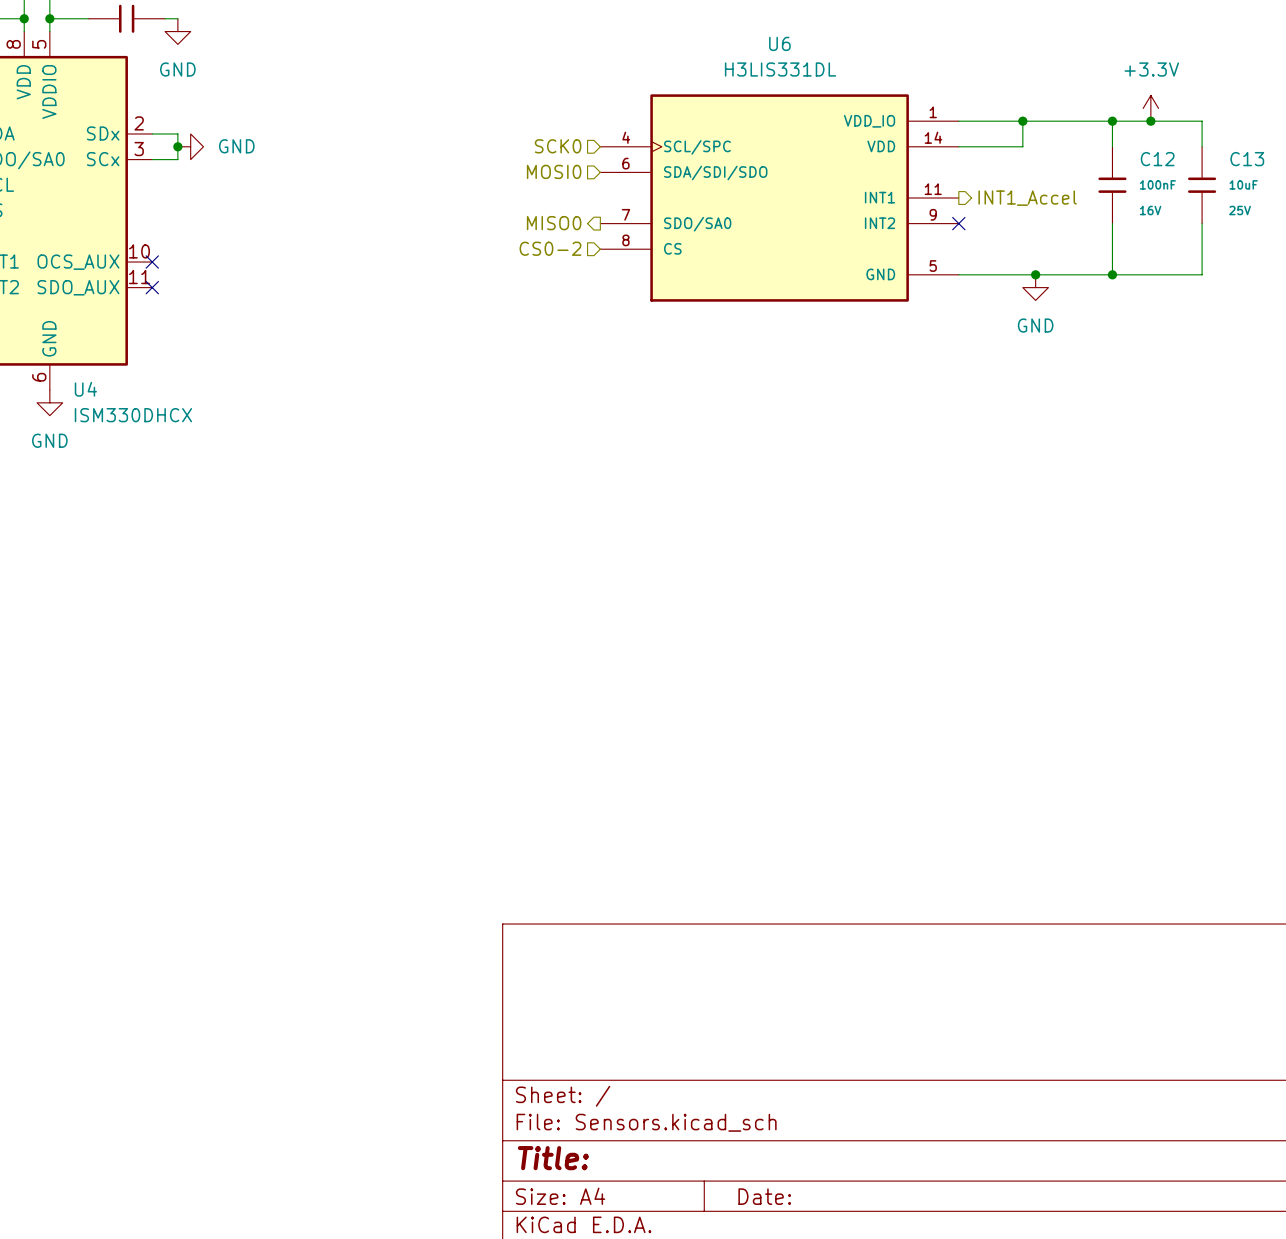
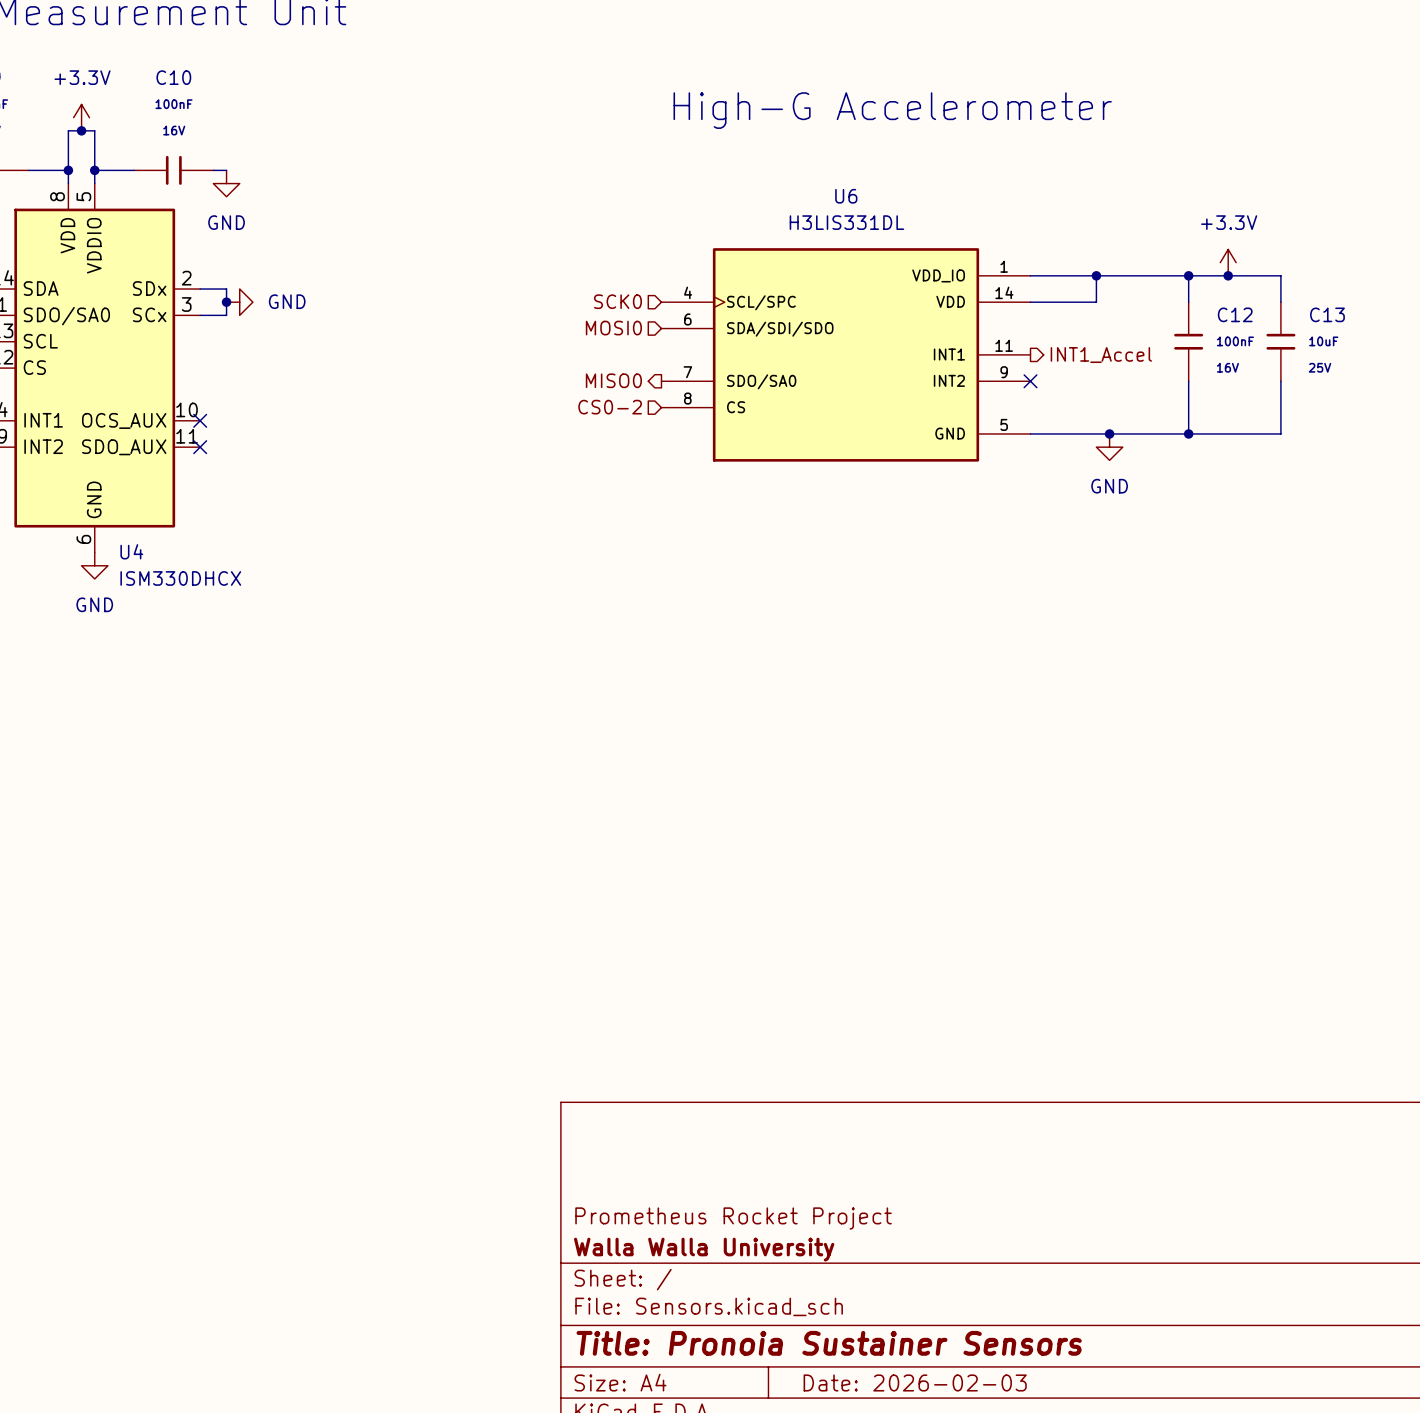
title block: none -> Prometheus Rocket Project (733, 1218)
title block: none -> Walla Walla University (704, 1249)
title block: Title: (553, 1158) -> Title: Pronoia Sustainer Sensors (829, 1343)
title block: Date: (764, 1196) -> Date: 2026-02-03 (915, 1382)

